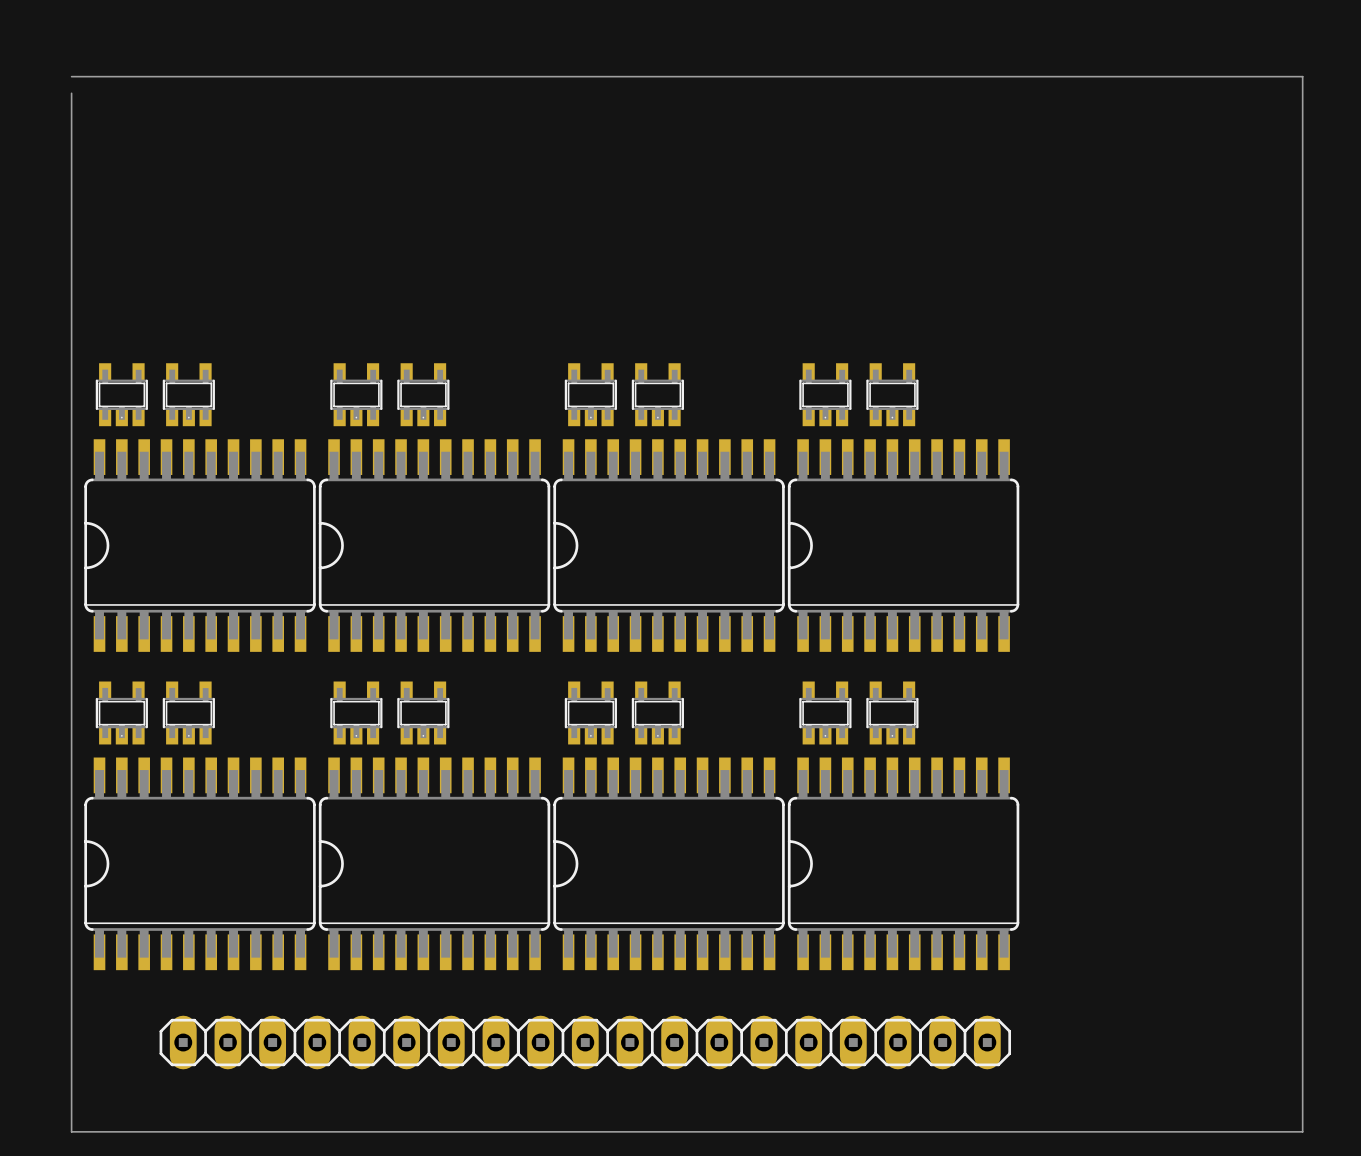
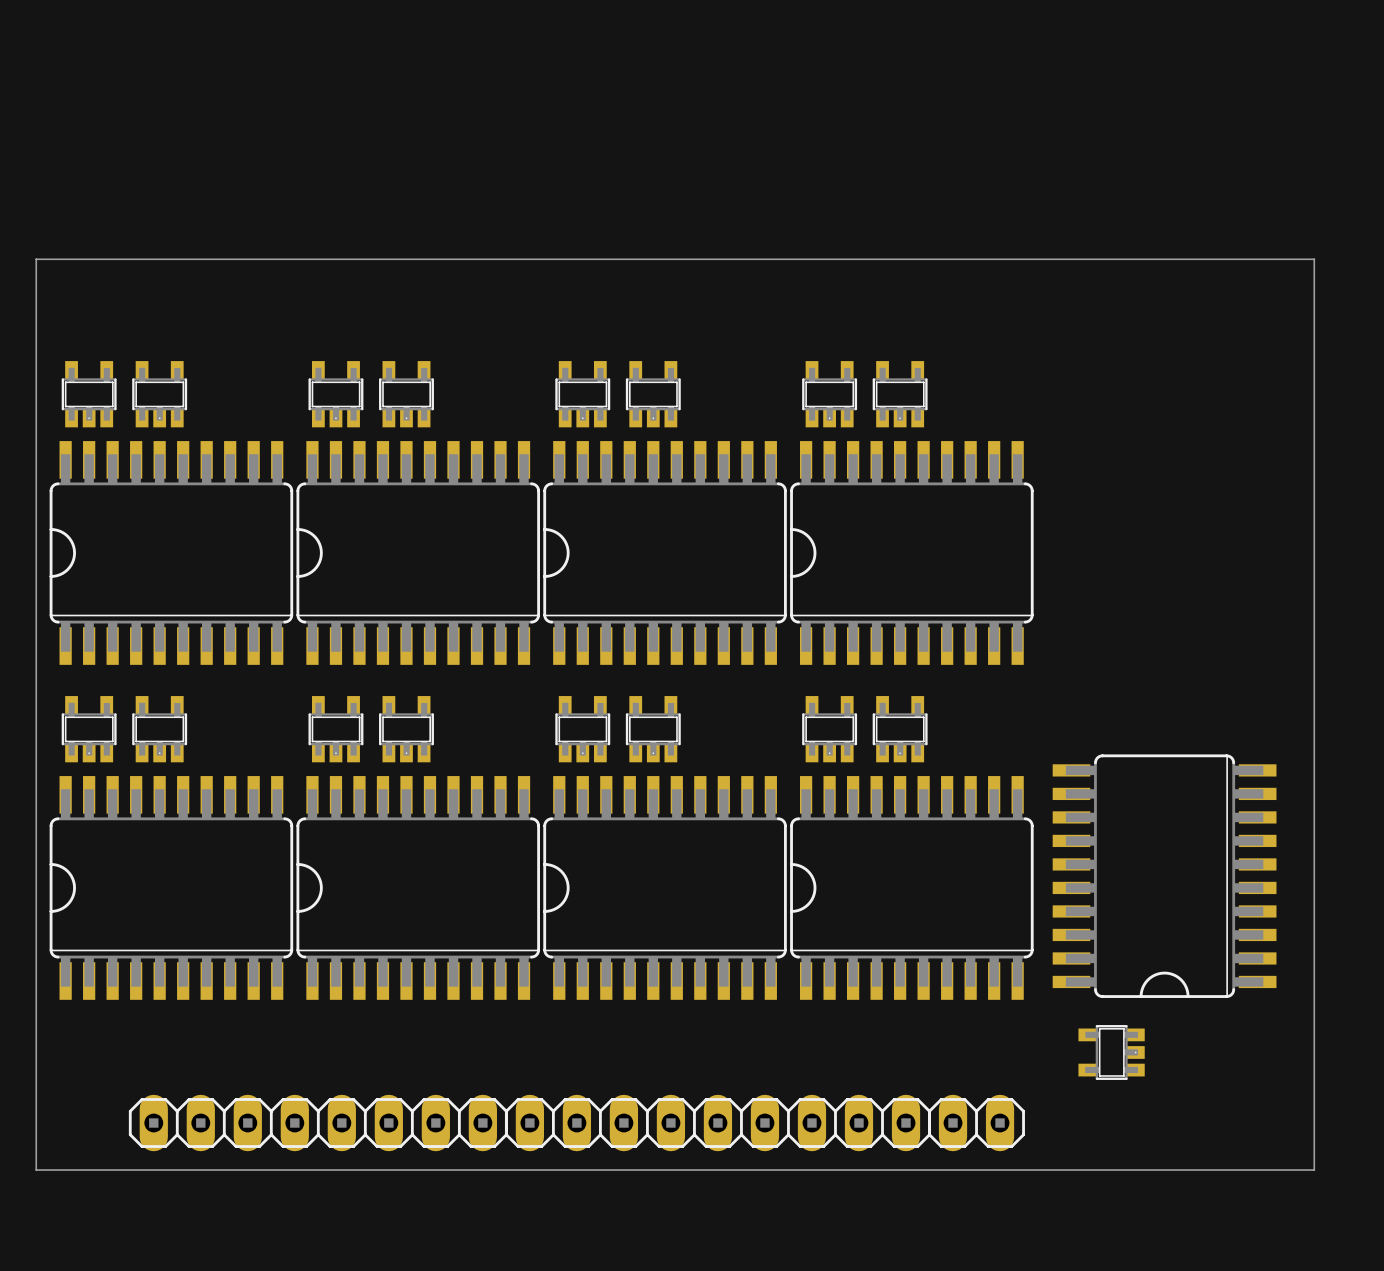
board edge: (71, 76) (1302, 76) (1302, 1131) (1285, 1131) -> (36, 259) (1314, 259) (1314, 1170)
board edge: (71, 93) (71, 266) -> none
part: none -> (1164, 876)
part: none -> (1111, 1052)
part position: (339, 1042) -> (318, 1123)
part position: (719, 1042) -> (717, 1123)
part position: (965, 1042) -> (976, 1123)

